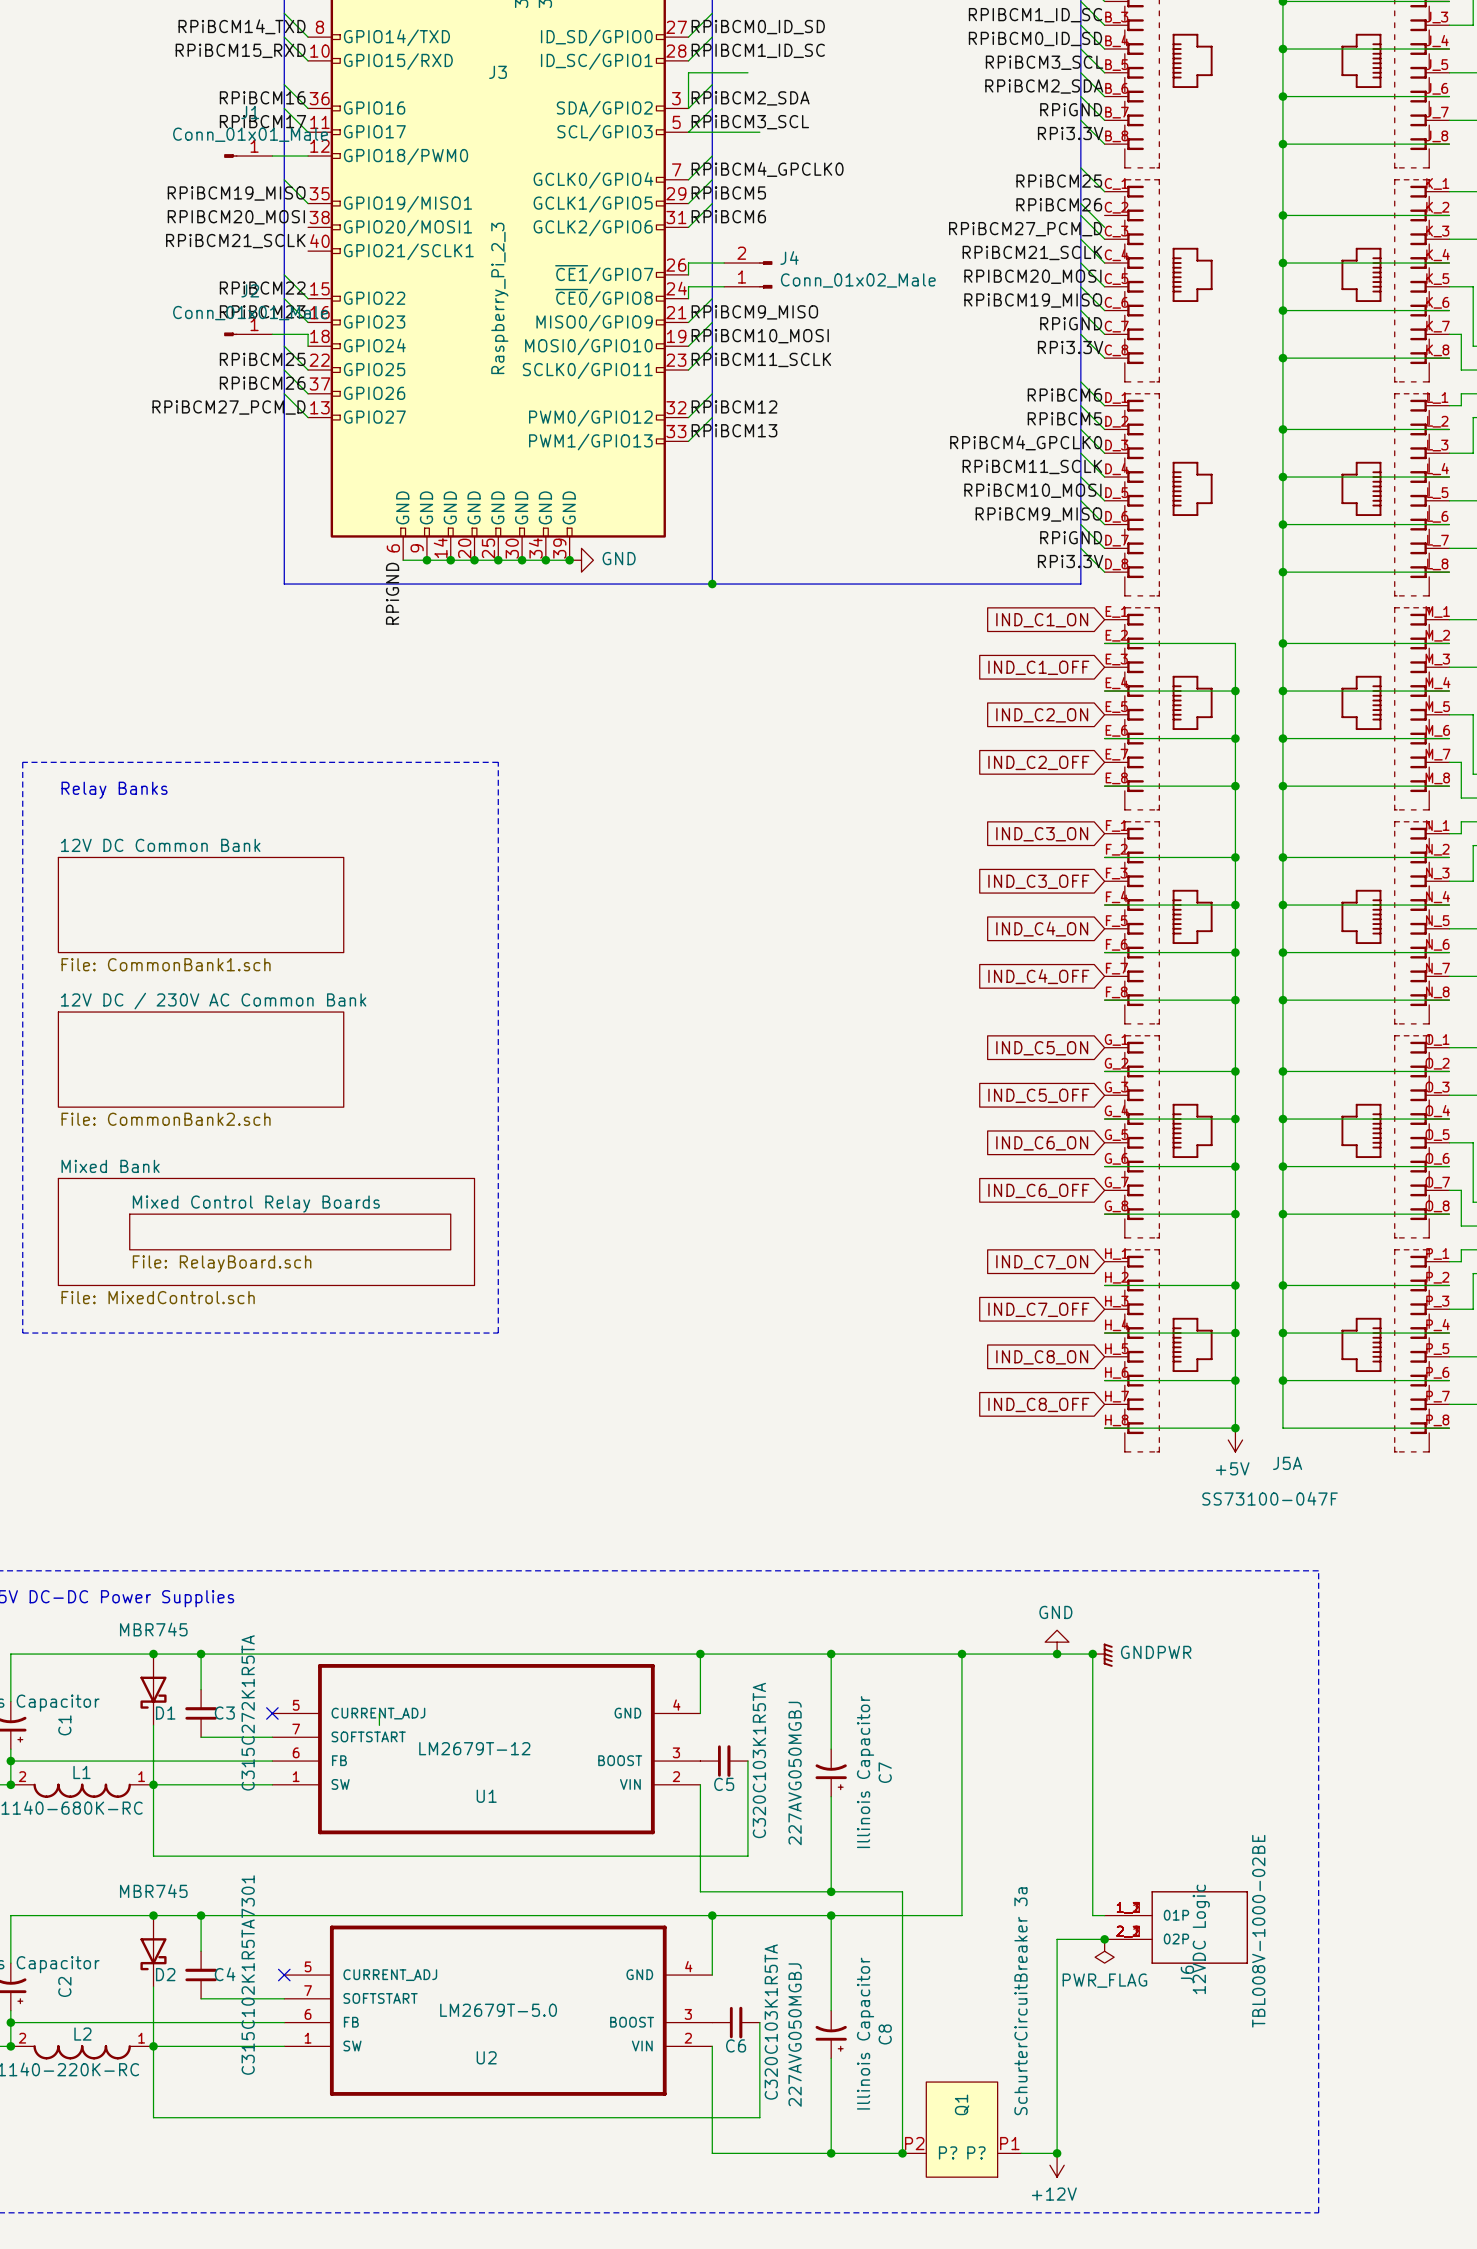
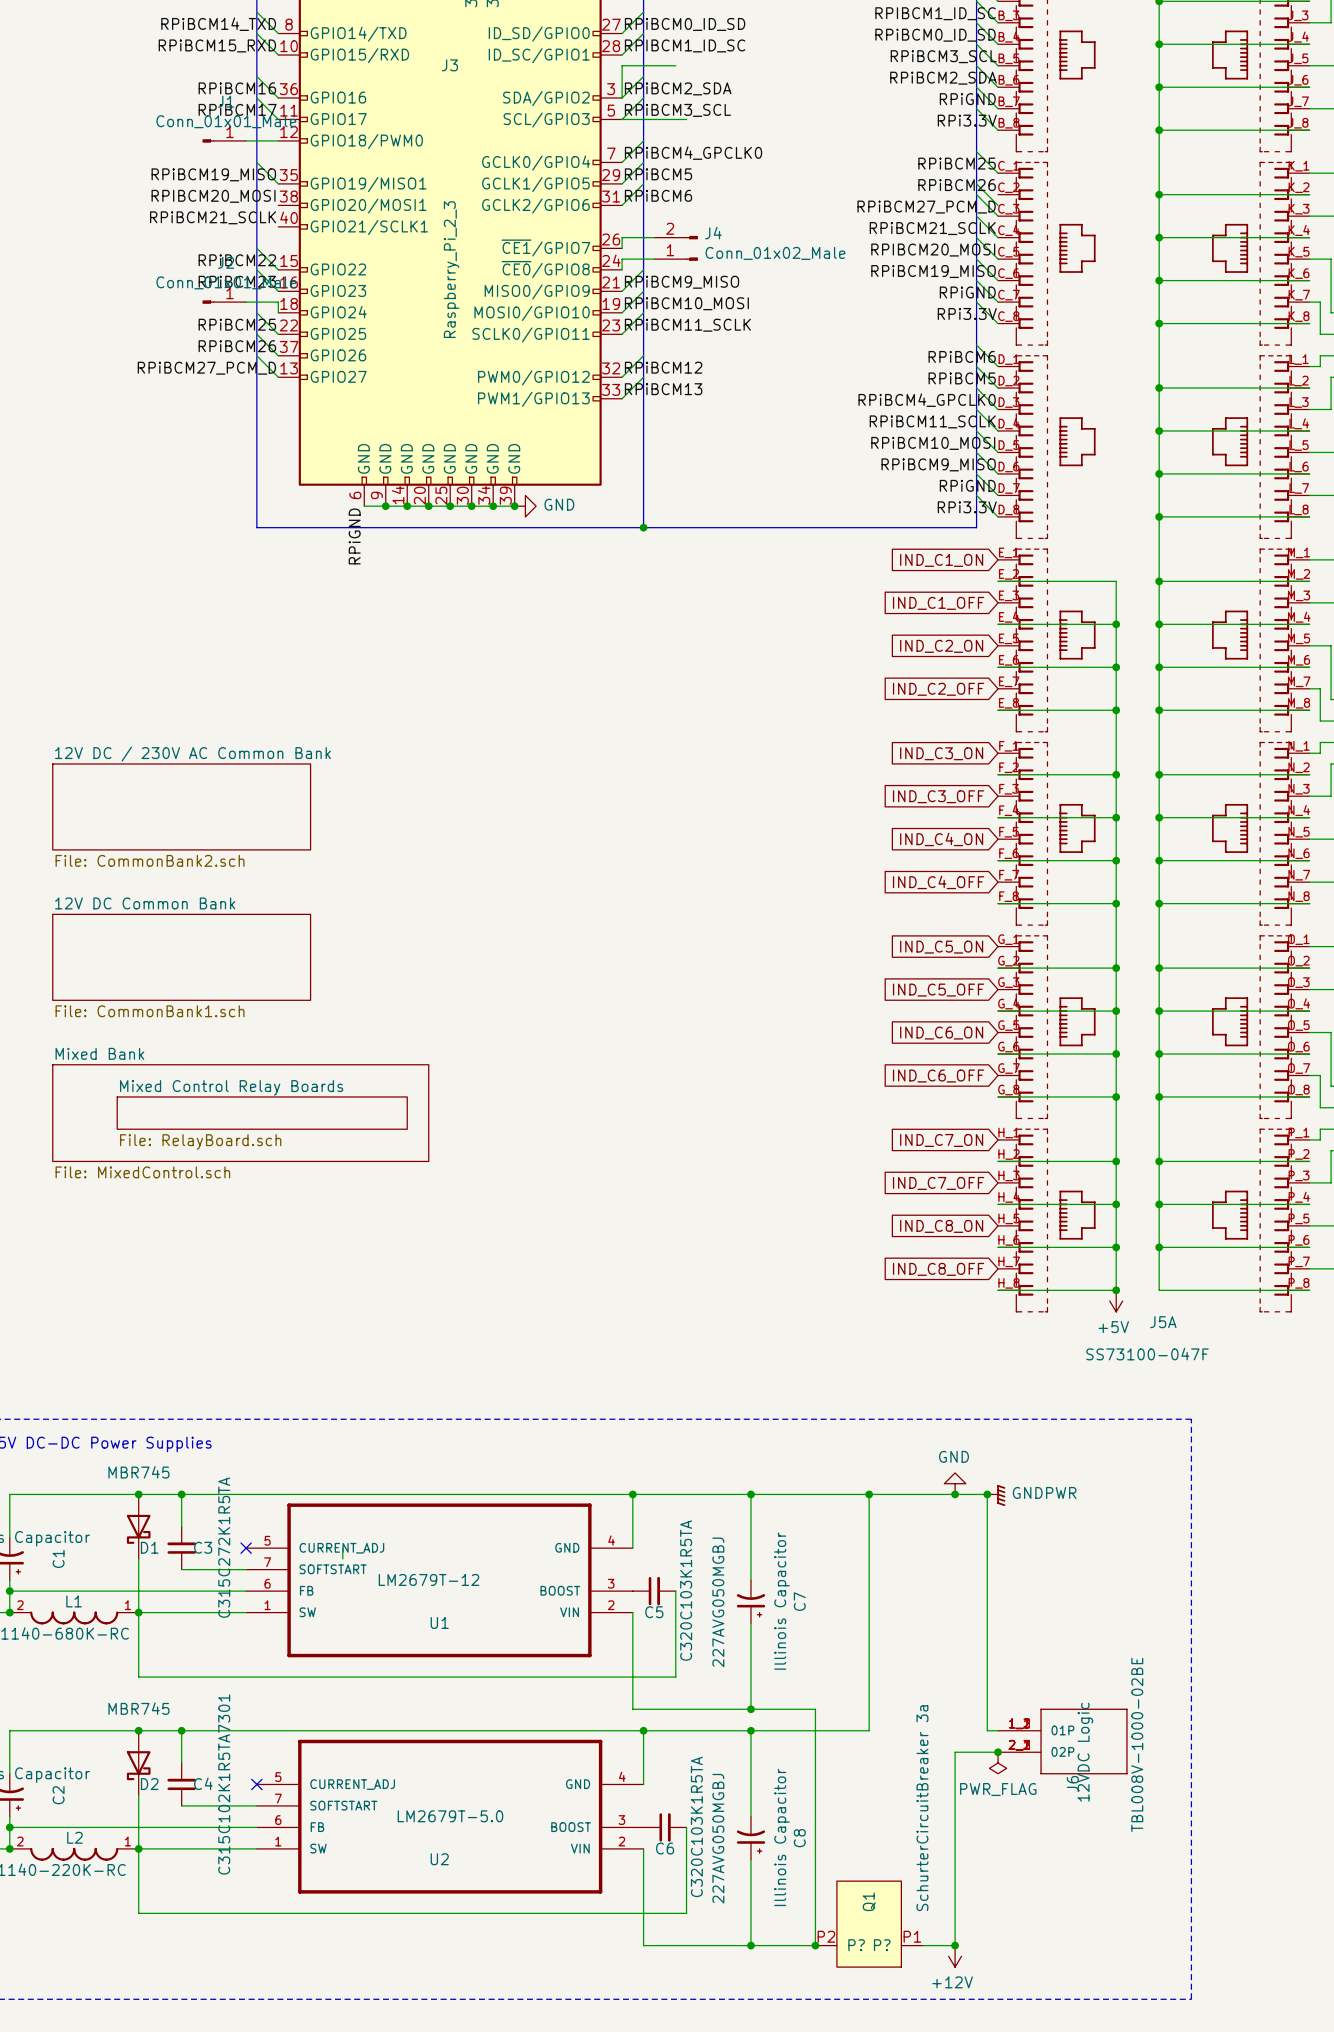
line: (22, 762) (22, 1333) (498, 1333) (498, 762) (22, 762) -> none
text: Relay Banks (114, 790) -> none
sheet 12V DC / 230V AC Common Bank: none -> File: CommonBank2.sch (181, 806)
sheet 12V DC Common Bank: File: CommonBank1.sch (201, 905) -> none
sheet 12V DC / 230V AC Common Bank name: 12V DC / 230V AC Common Bank (213, 1001) -> 12V DC Common Bank (145, 903)
sheet 12V DC / 230V AC Common Bank value: File: CommonBank2.sch (166, 1119) -> File: CommonBank1.sch (150, 1011)

